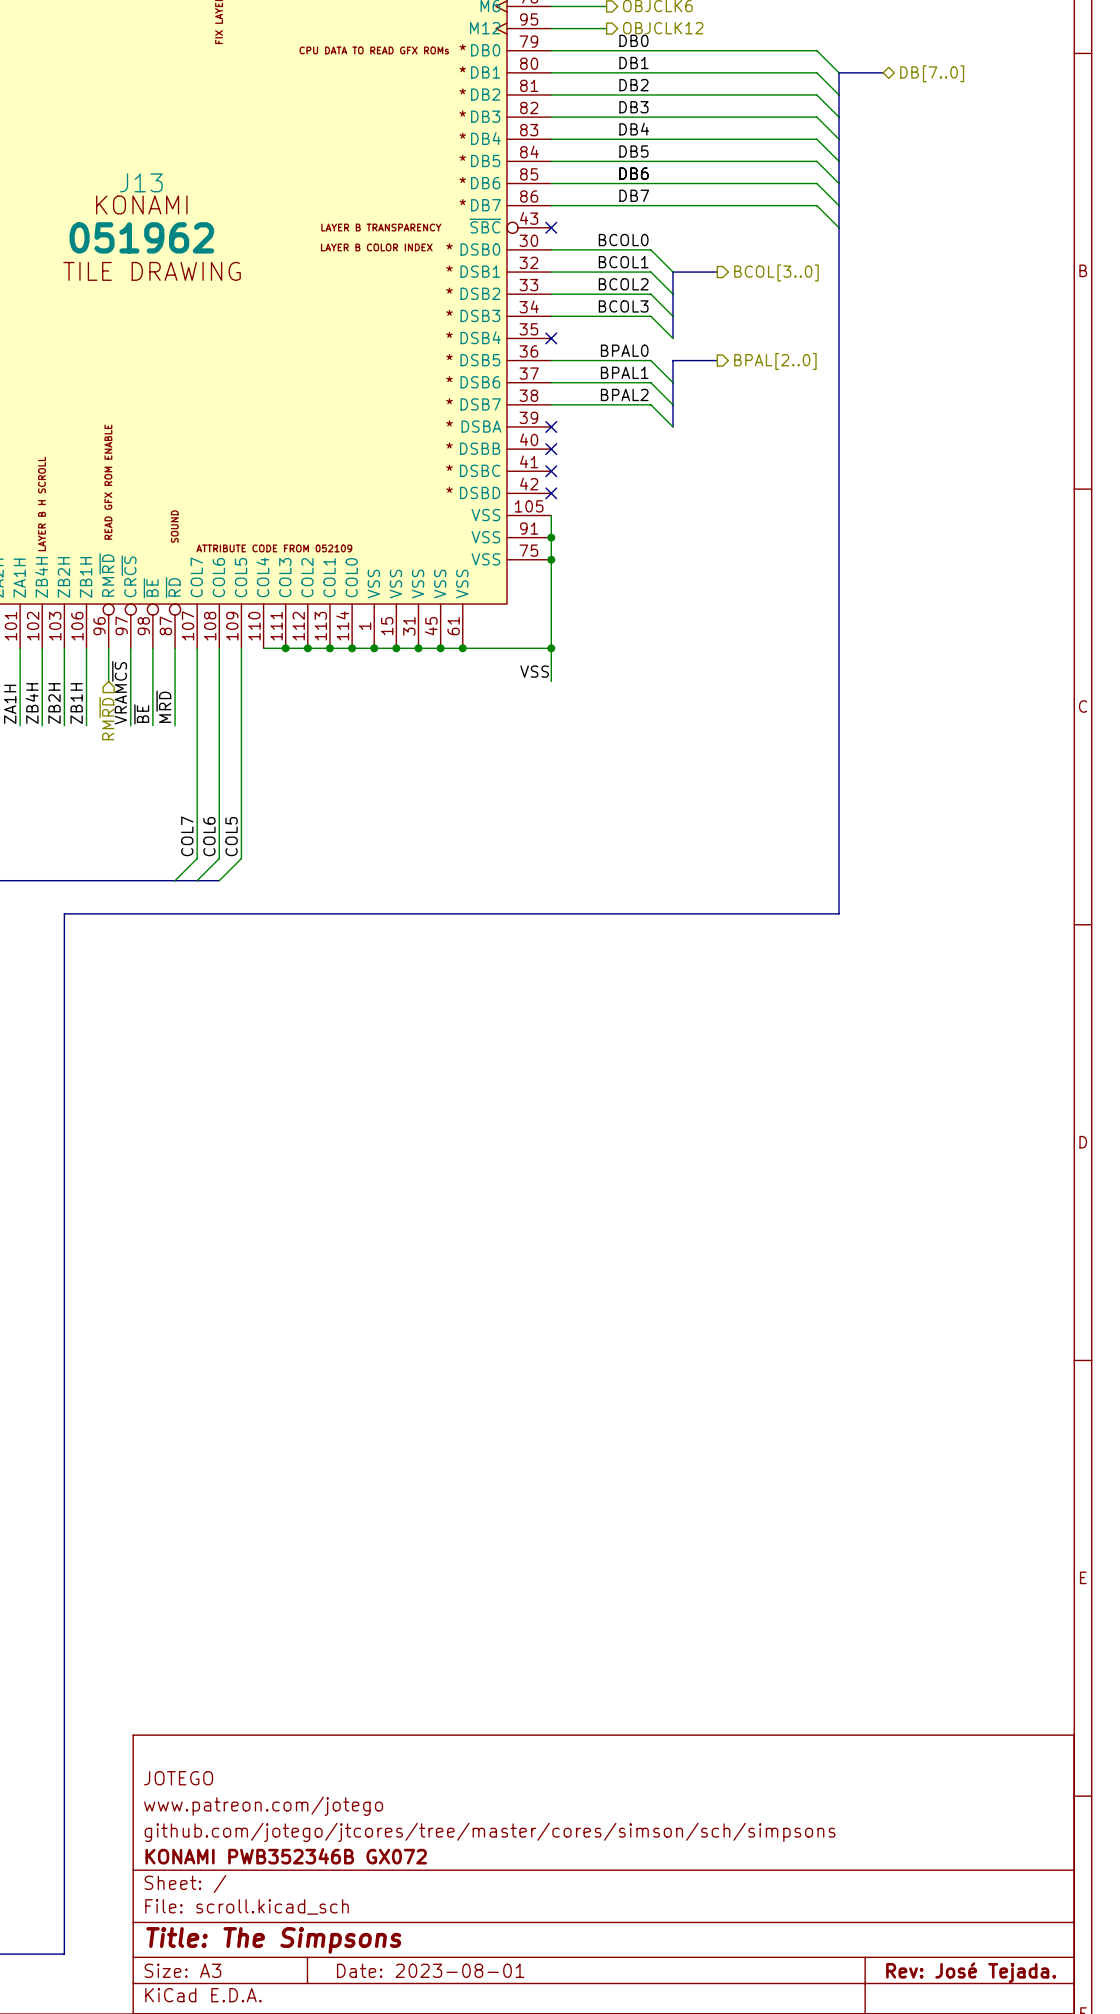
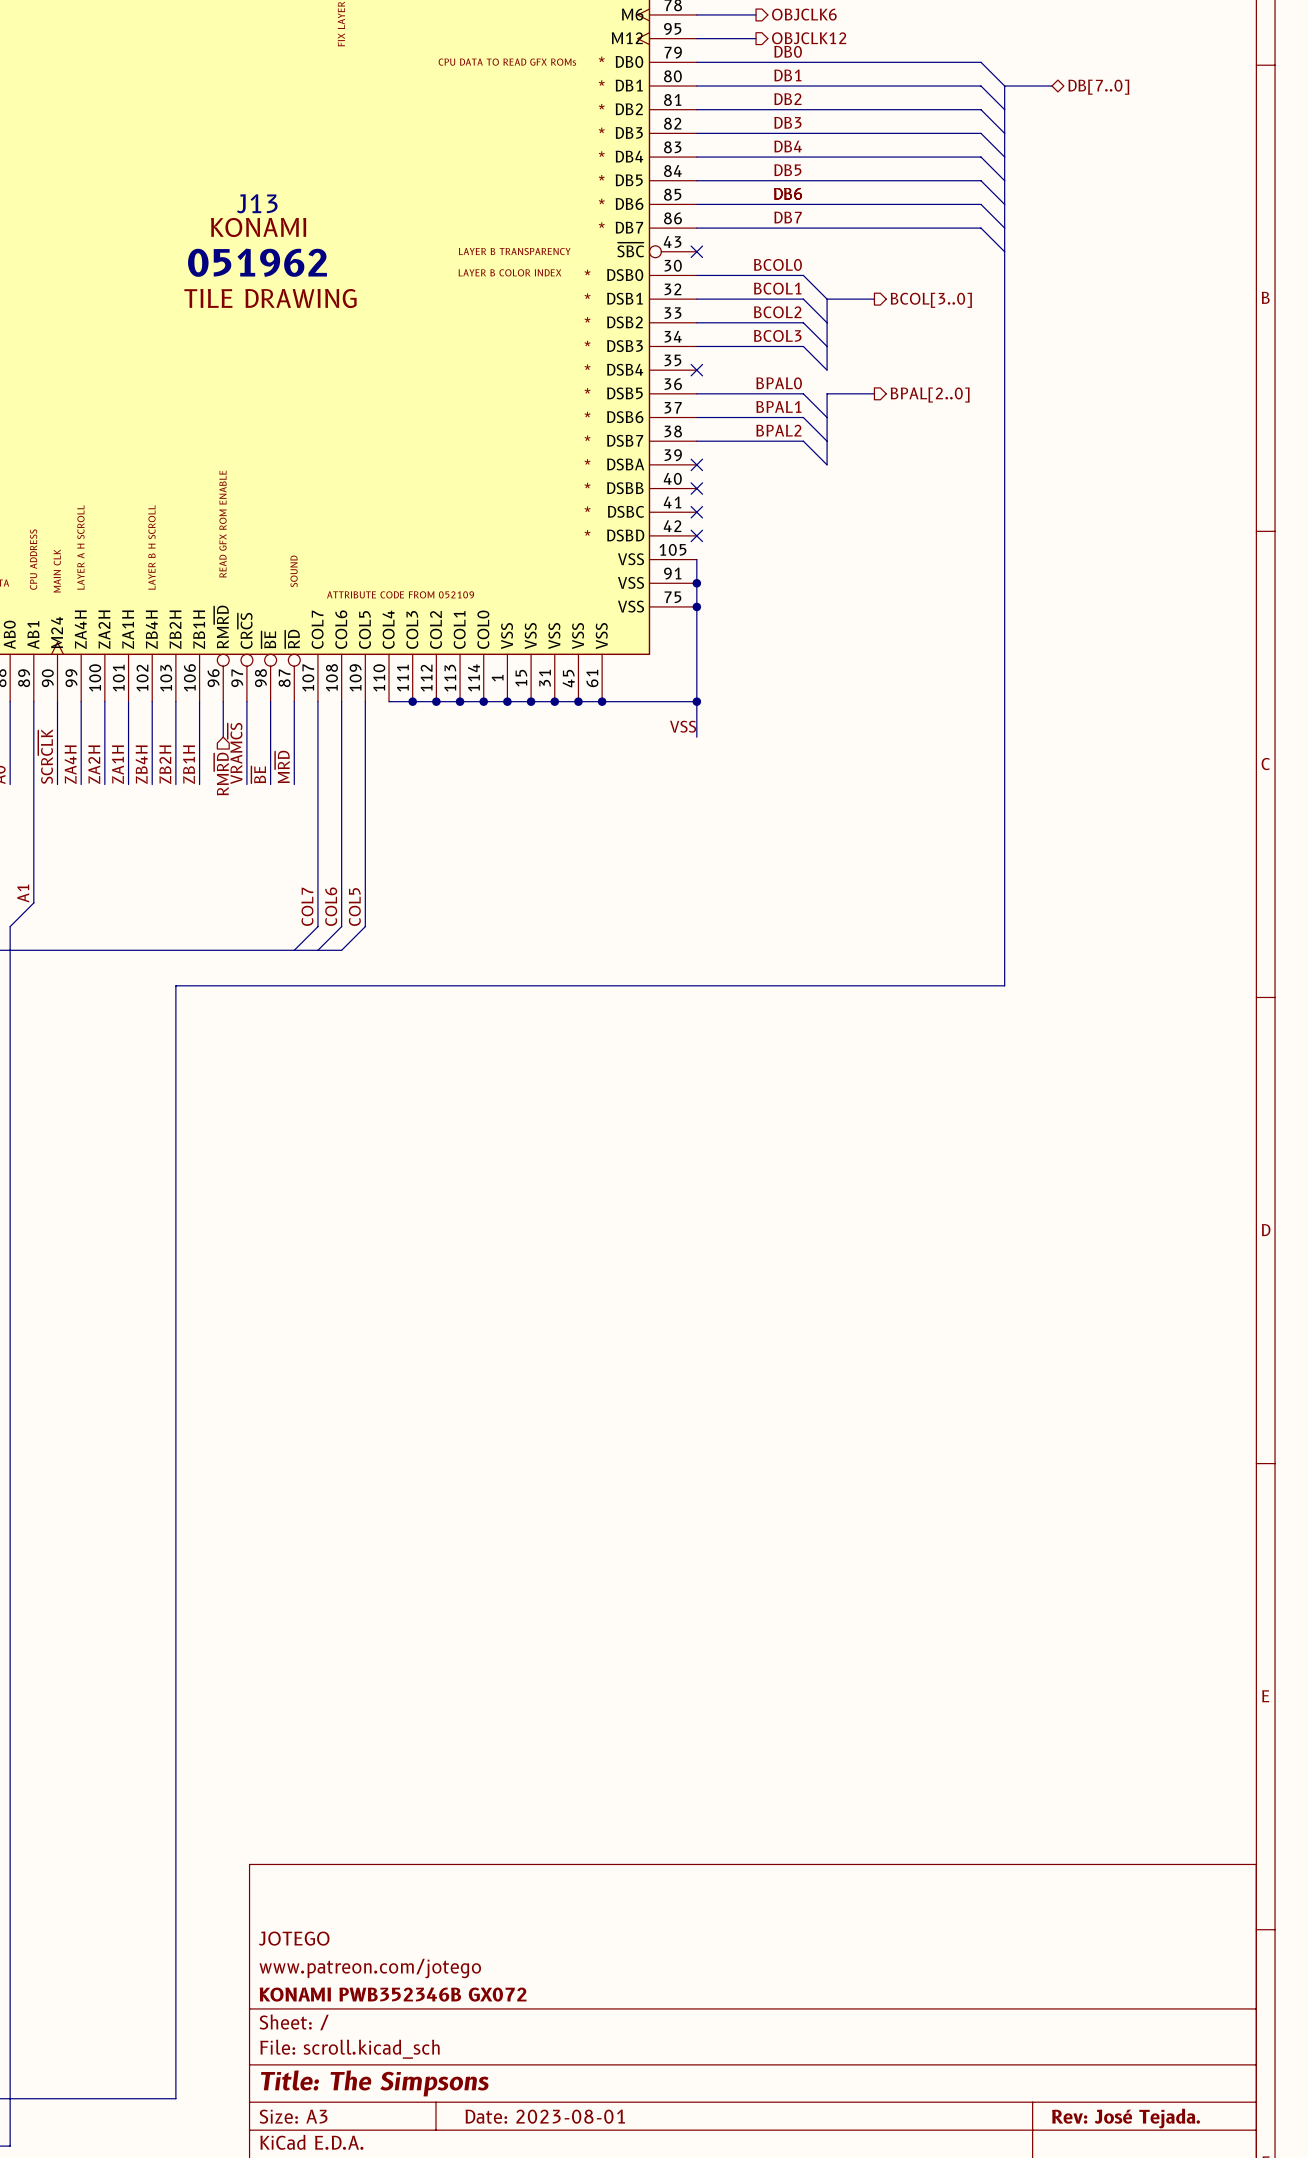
title block: JOTEGO (178, 1778) -> none
title block: www.patreon.com/jotego (263, 1806) -> JOTEGO (294, 1938)
title block: github.com/jotego/jtcores/tree/master/cores/simson/sch/simpsons (490, 1832) -> www.patreon.com/jotego (370, 1968)

